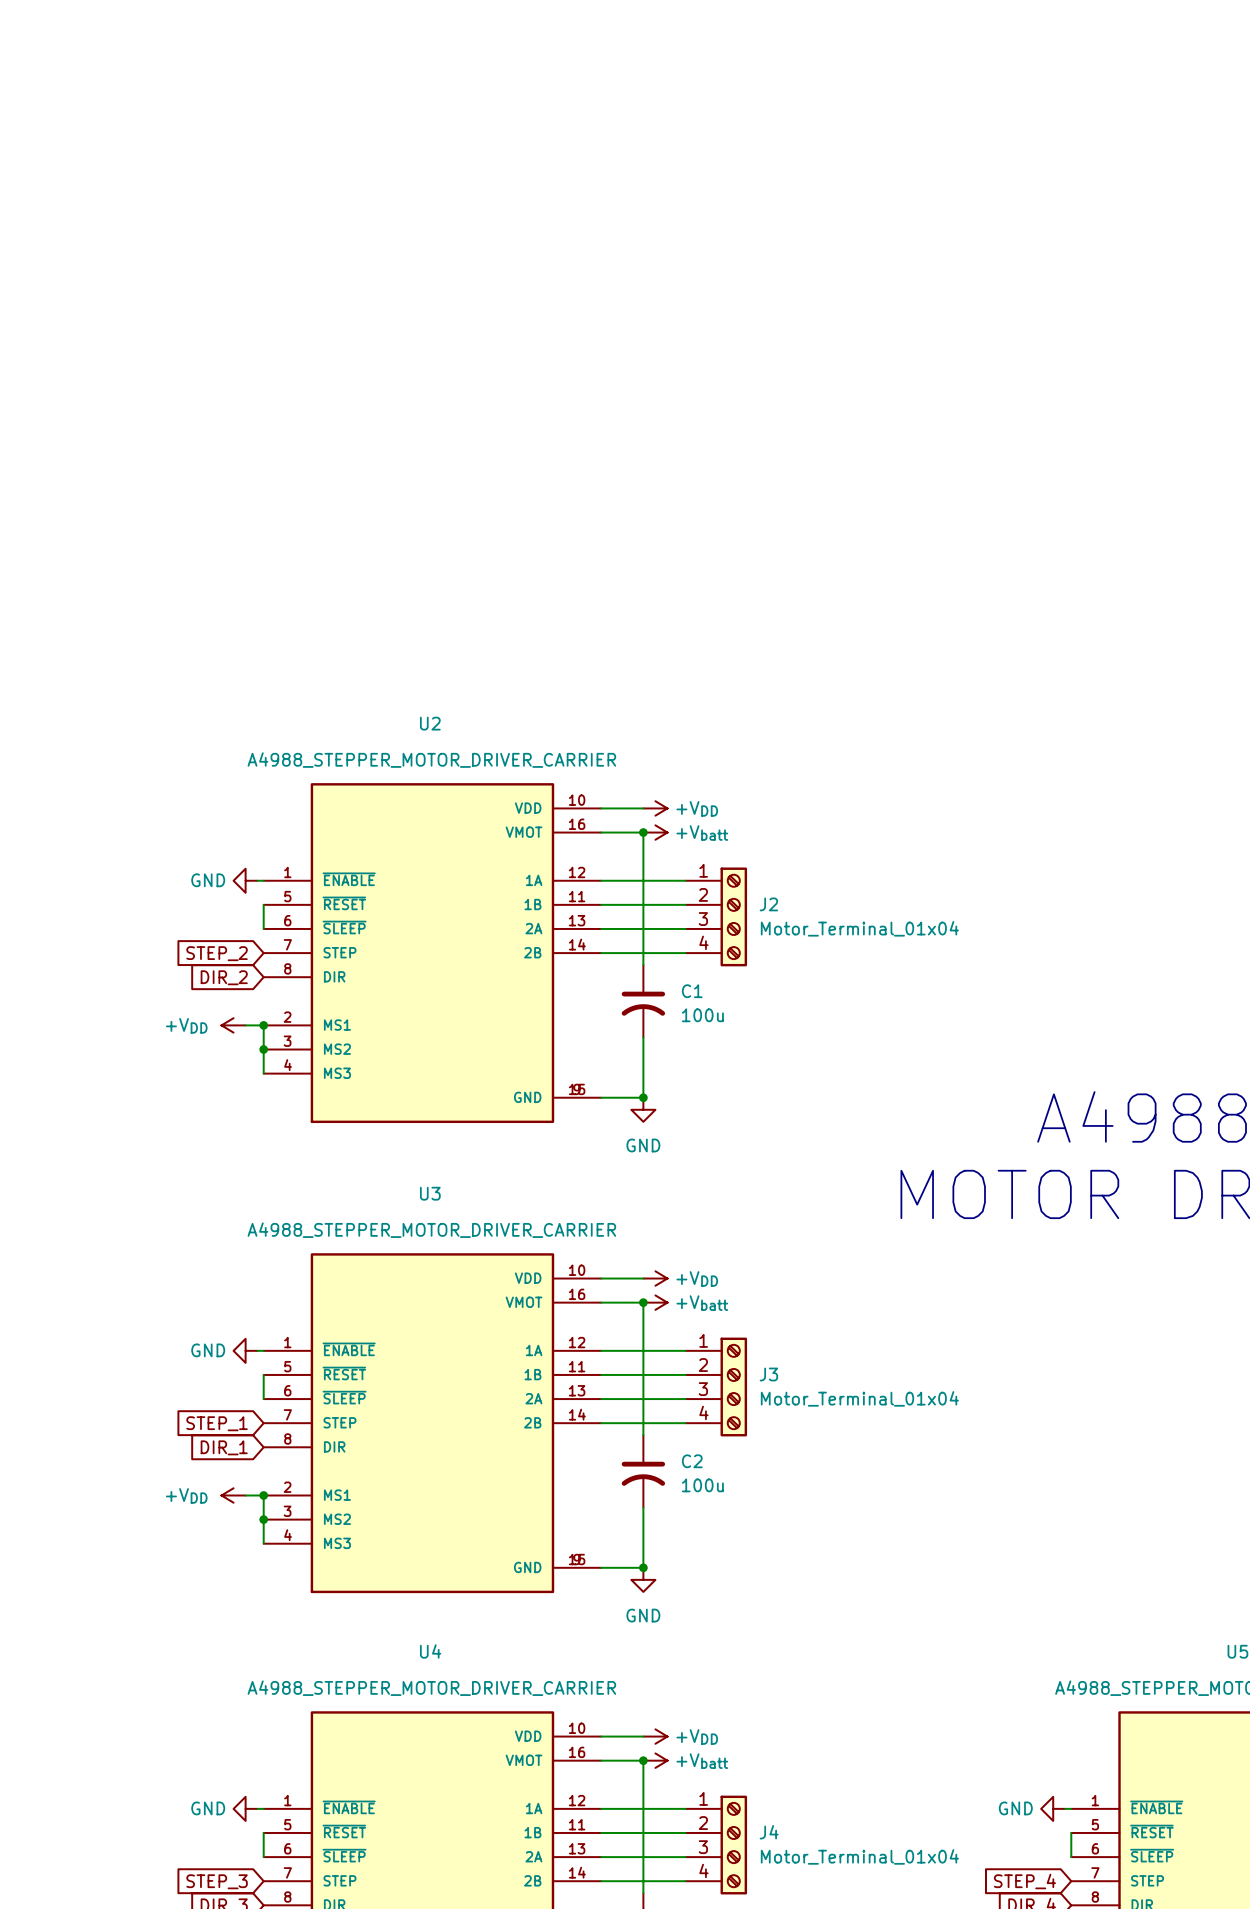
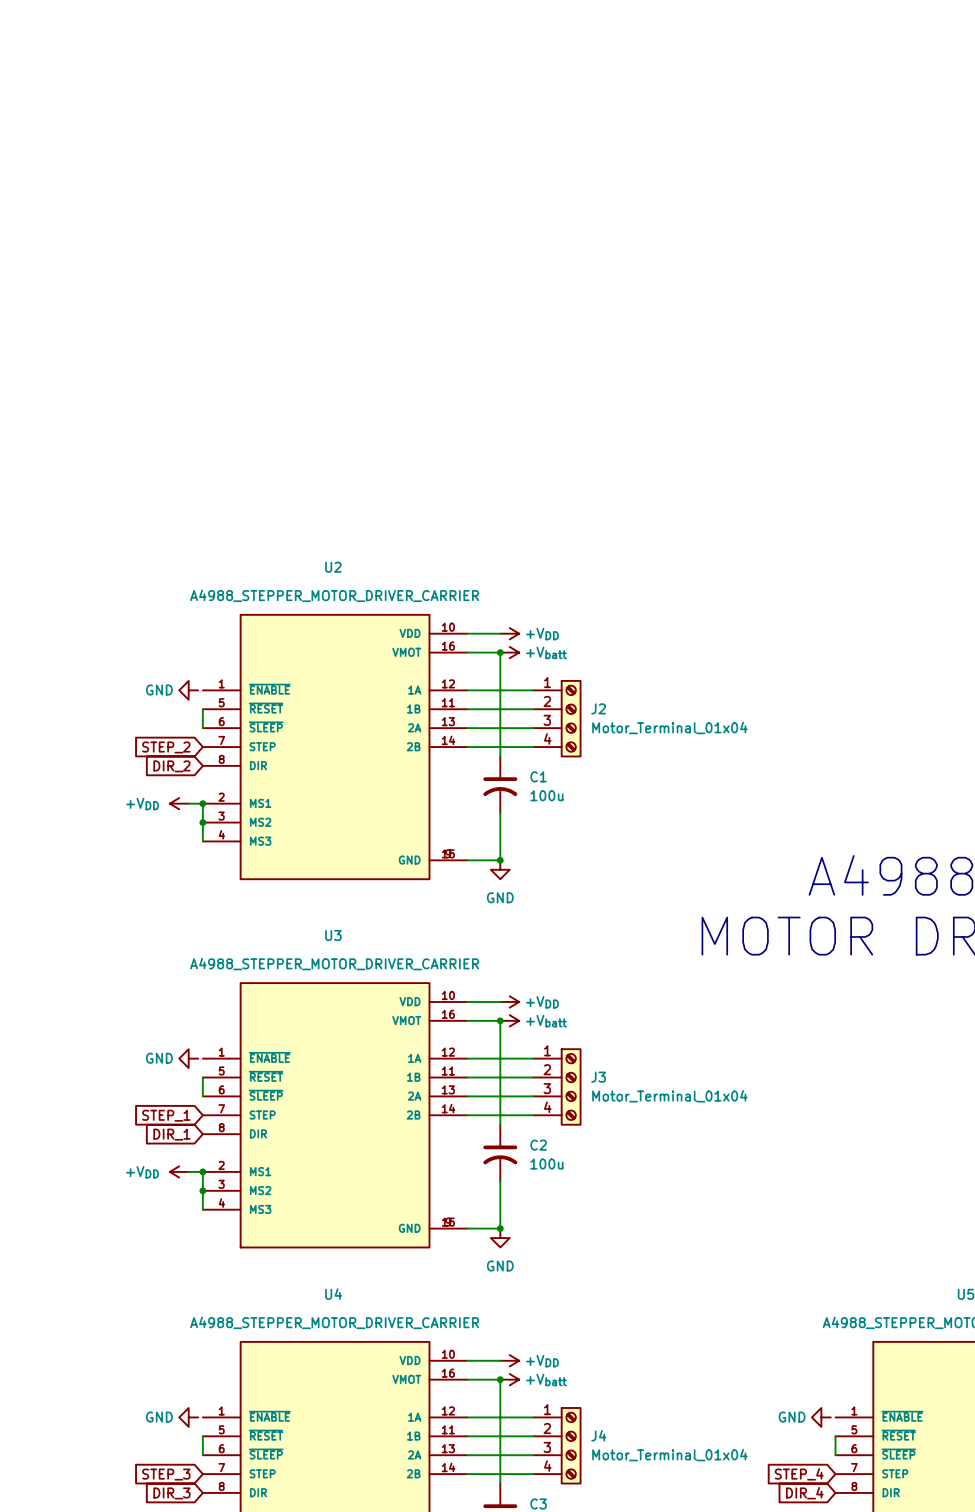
wire: (257, 880) (263, 880) -> none
wire: (257, 1350) (263, 1350) -> none
wire: (257, 1808) (263, 1808) -> none
wire: (1065, 1808) (1071, 1808) -> none

